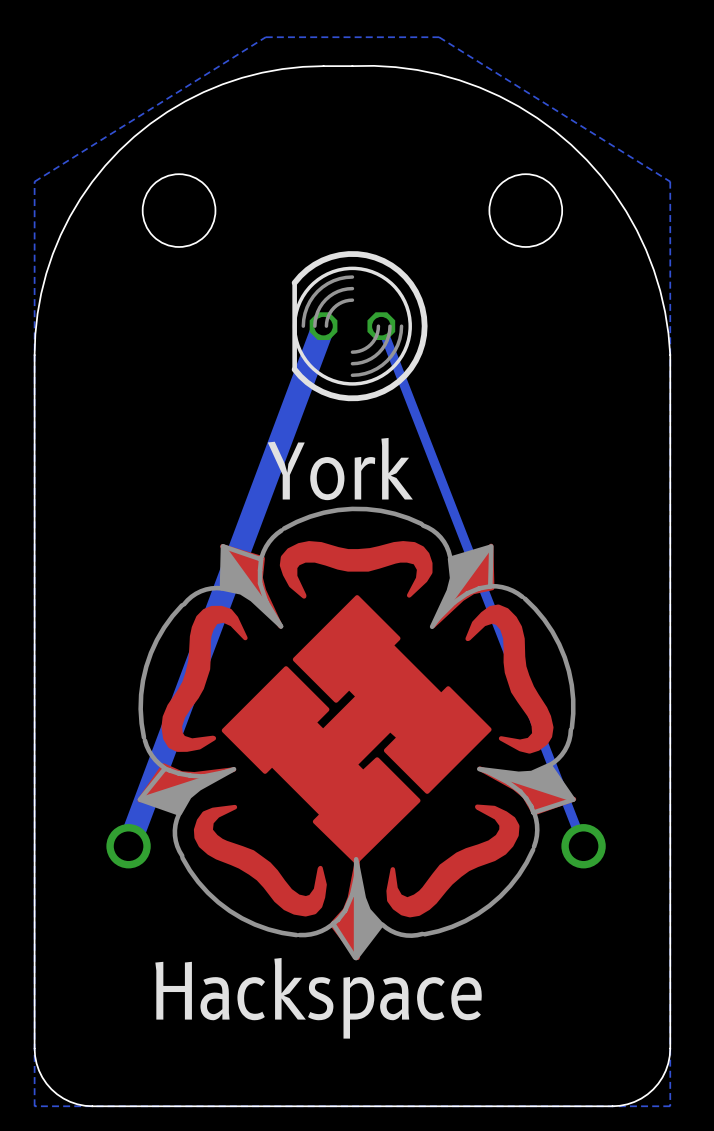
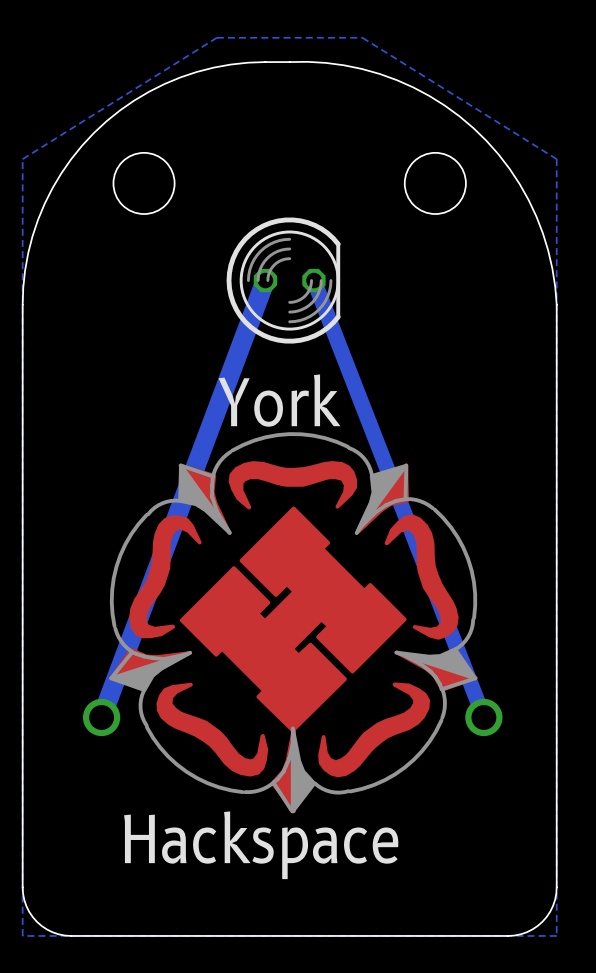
part rotation: 0° (359, 326) -> 180° (283, 280)
bottom track width: thin (381, 326) (583, 846) -> thick (313, 280) (483, 717)

